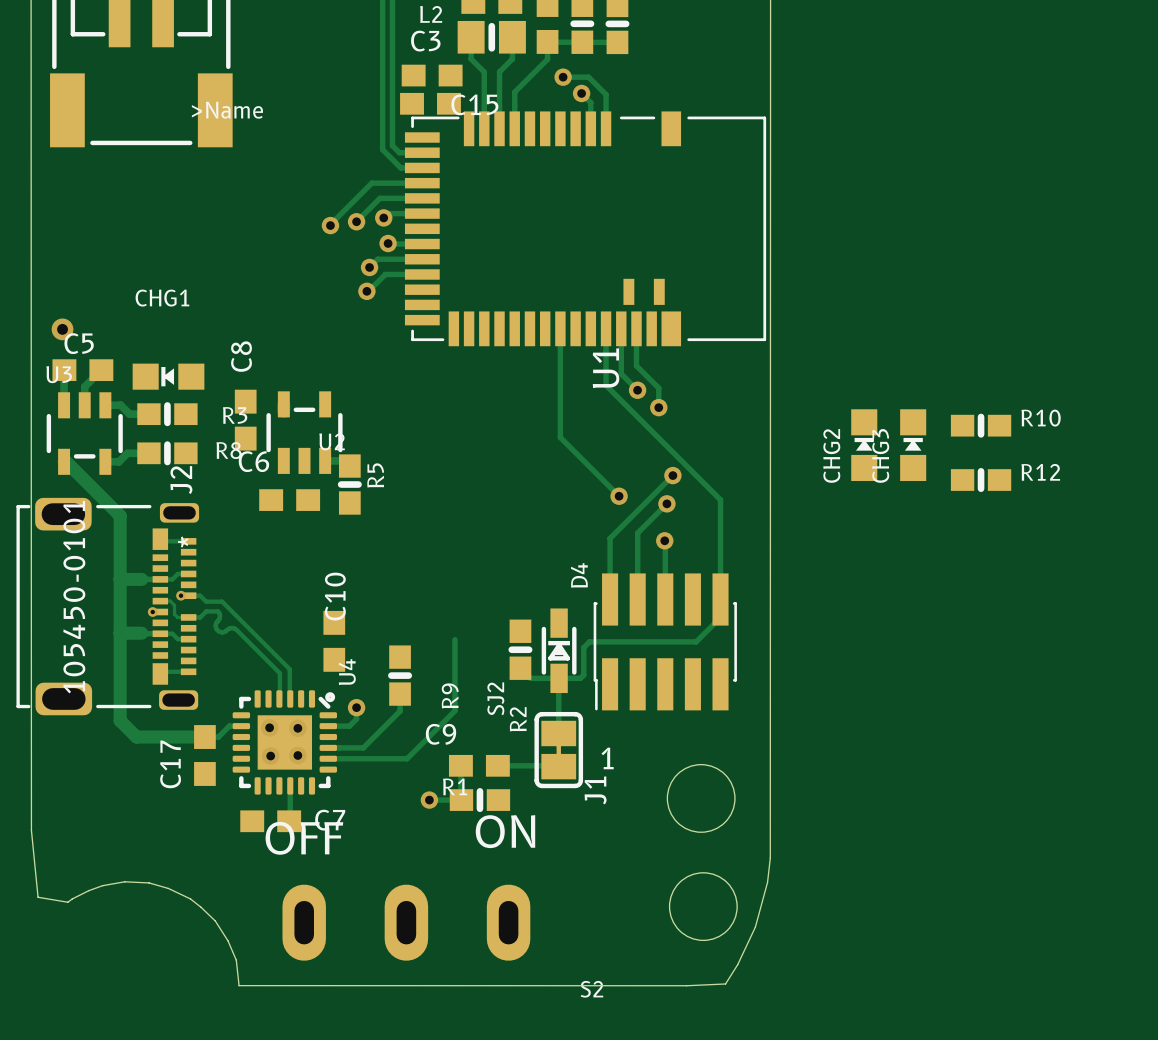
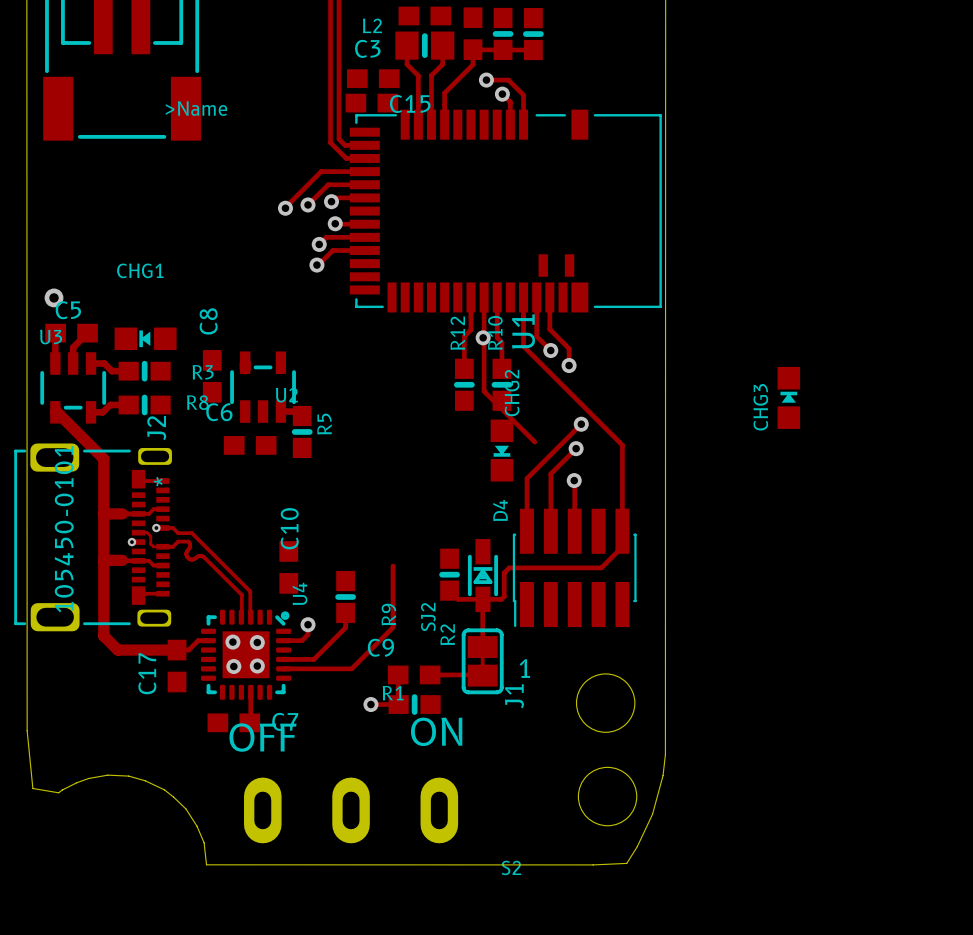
track: none -> (470, 297) (470, 329) (464, 336) (464, 368)
track: none -> (497, 297) (497, 337) (501, 342) (501, 368)
via: none -> (483, 337)
R10 name position: R10 (1041, 418) -> R10 (495, 332)
R10 rotation: 0° (981, 425) -> 90° clockwise (501, 384)
R10 position: (981, 425) -> (501, 384)
CHG2 rotation: 0° (864, 445) -> 180° (501, 450)
CHG2 position: (864, 445) -> (501, 450)
CHG2 name position: CHG2 (831, 455) -> CHG2 (512, 393)
R12 name position: R12 (1040, 472) -> R12 (457, 333)
R12 rotation: 0° (981, 480) -> 90° clockwise (464, 384)
R12 position: (981, 480) -> (464, 384)
via: (619, 496) -> none

